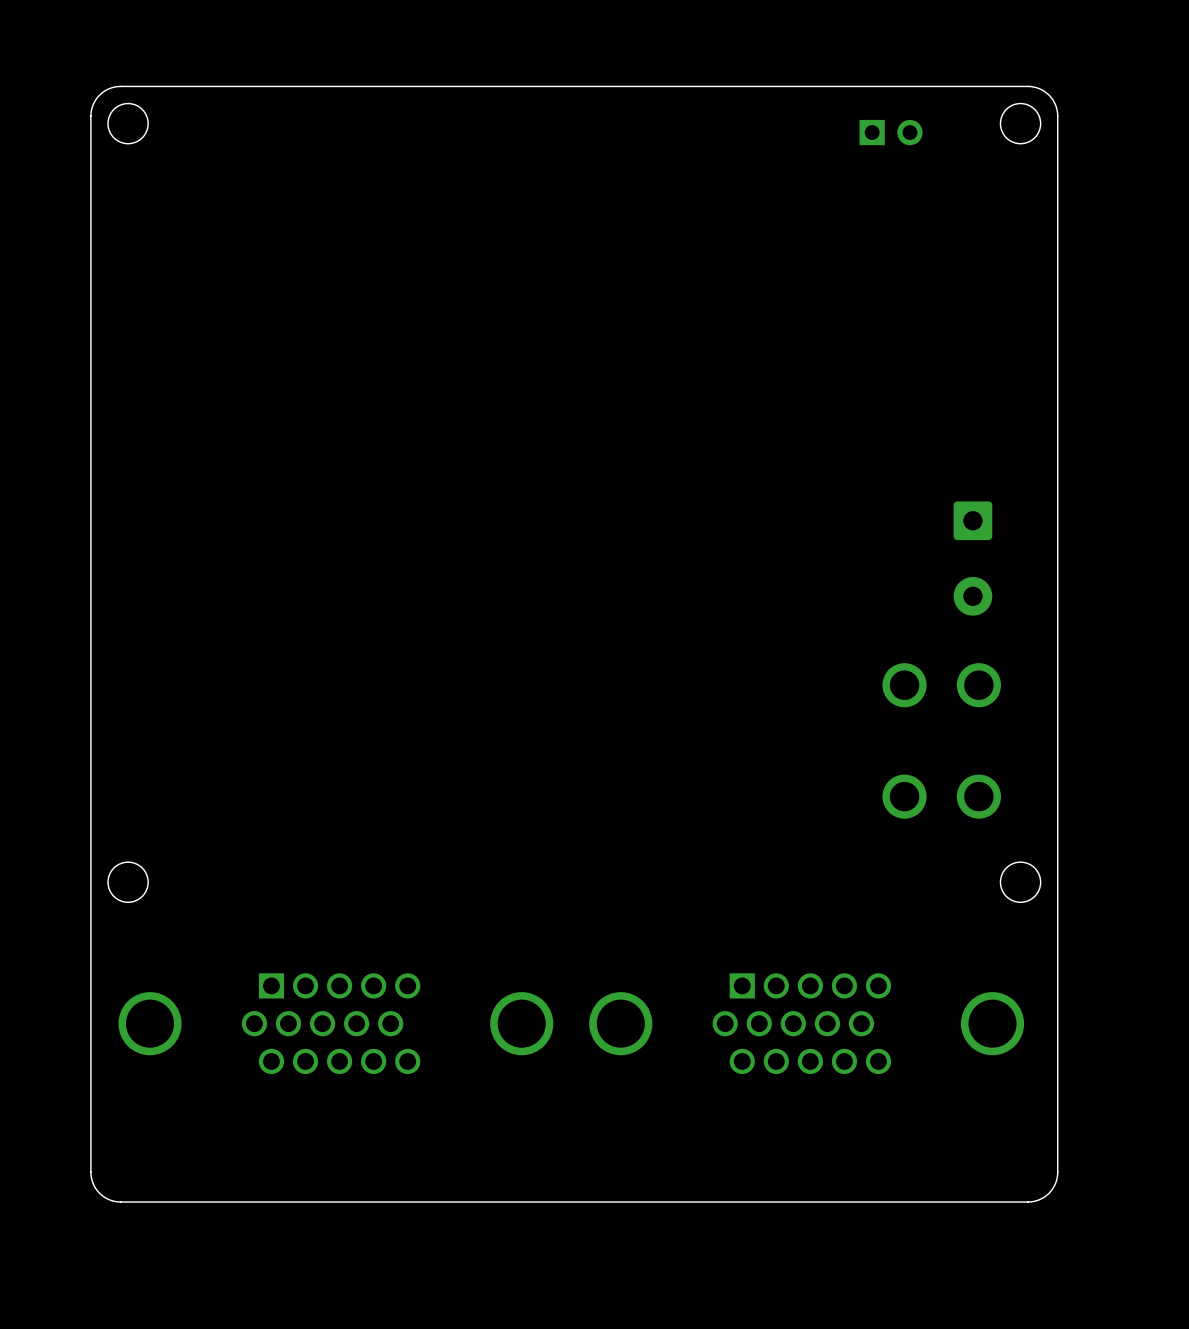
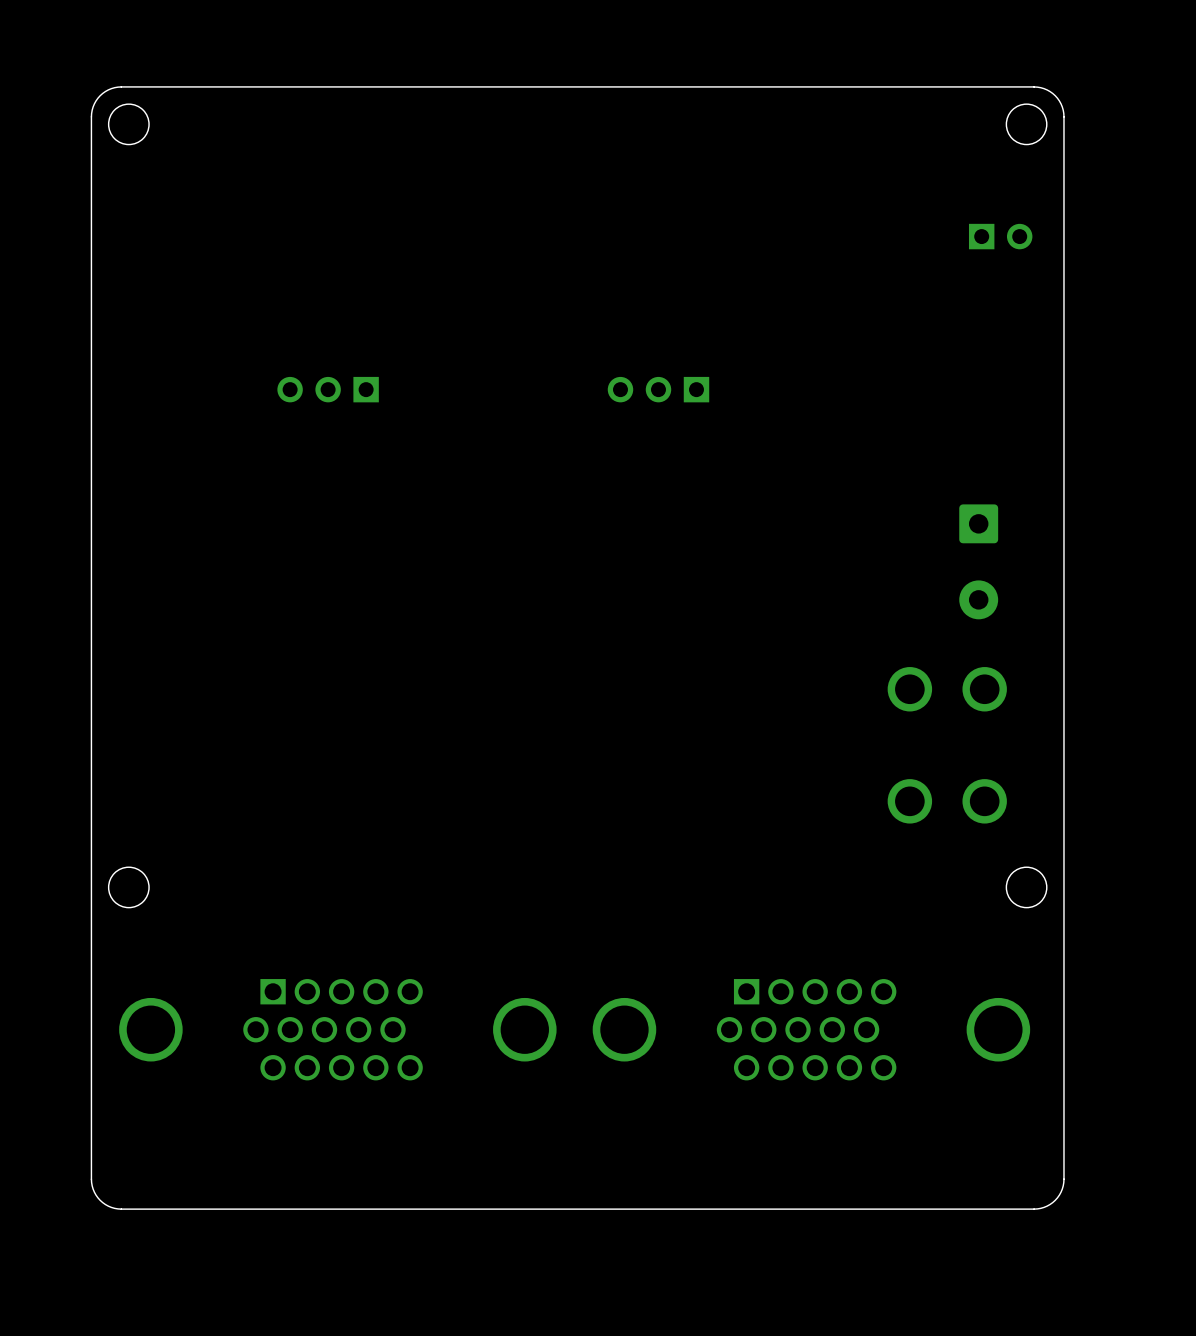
part position: (891, 132) -> (1000, 236)
part: none -> (328, 389)
part: none -> (658, 389)

